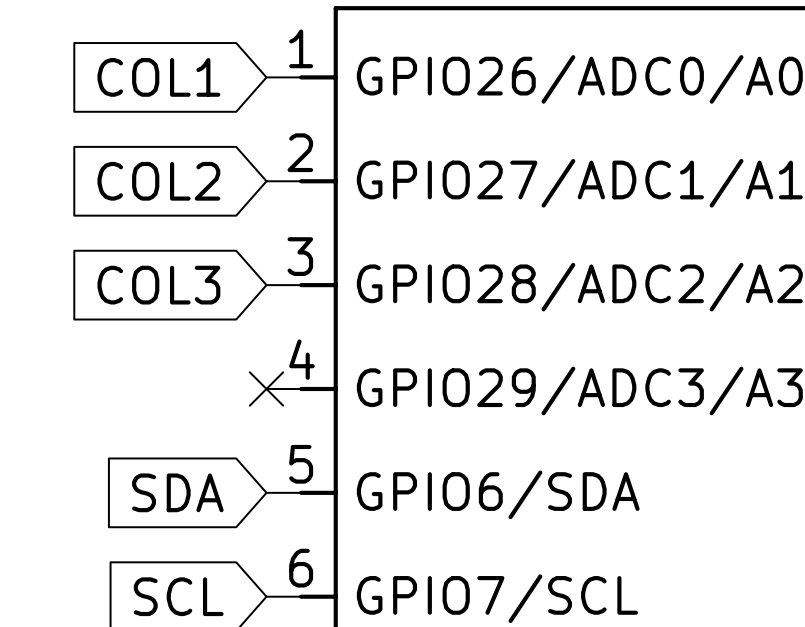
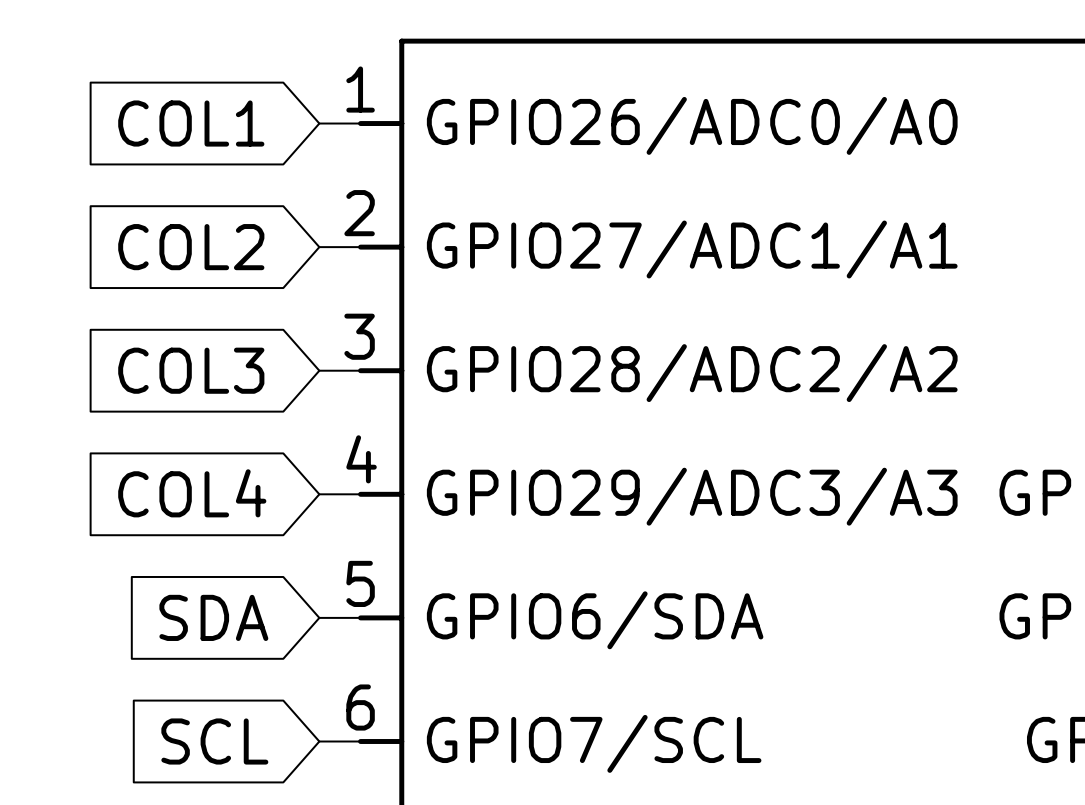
global label: none -> COL4 (192, 493)
no-connect mark: (266, 388) -> none

